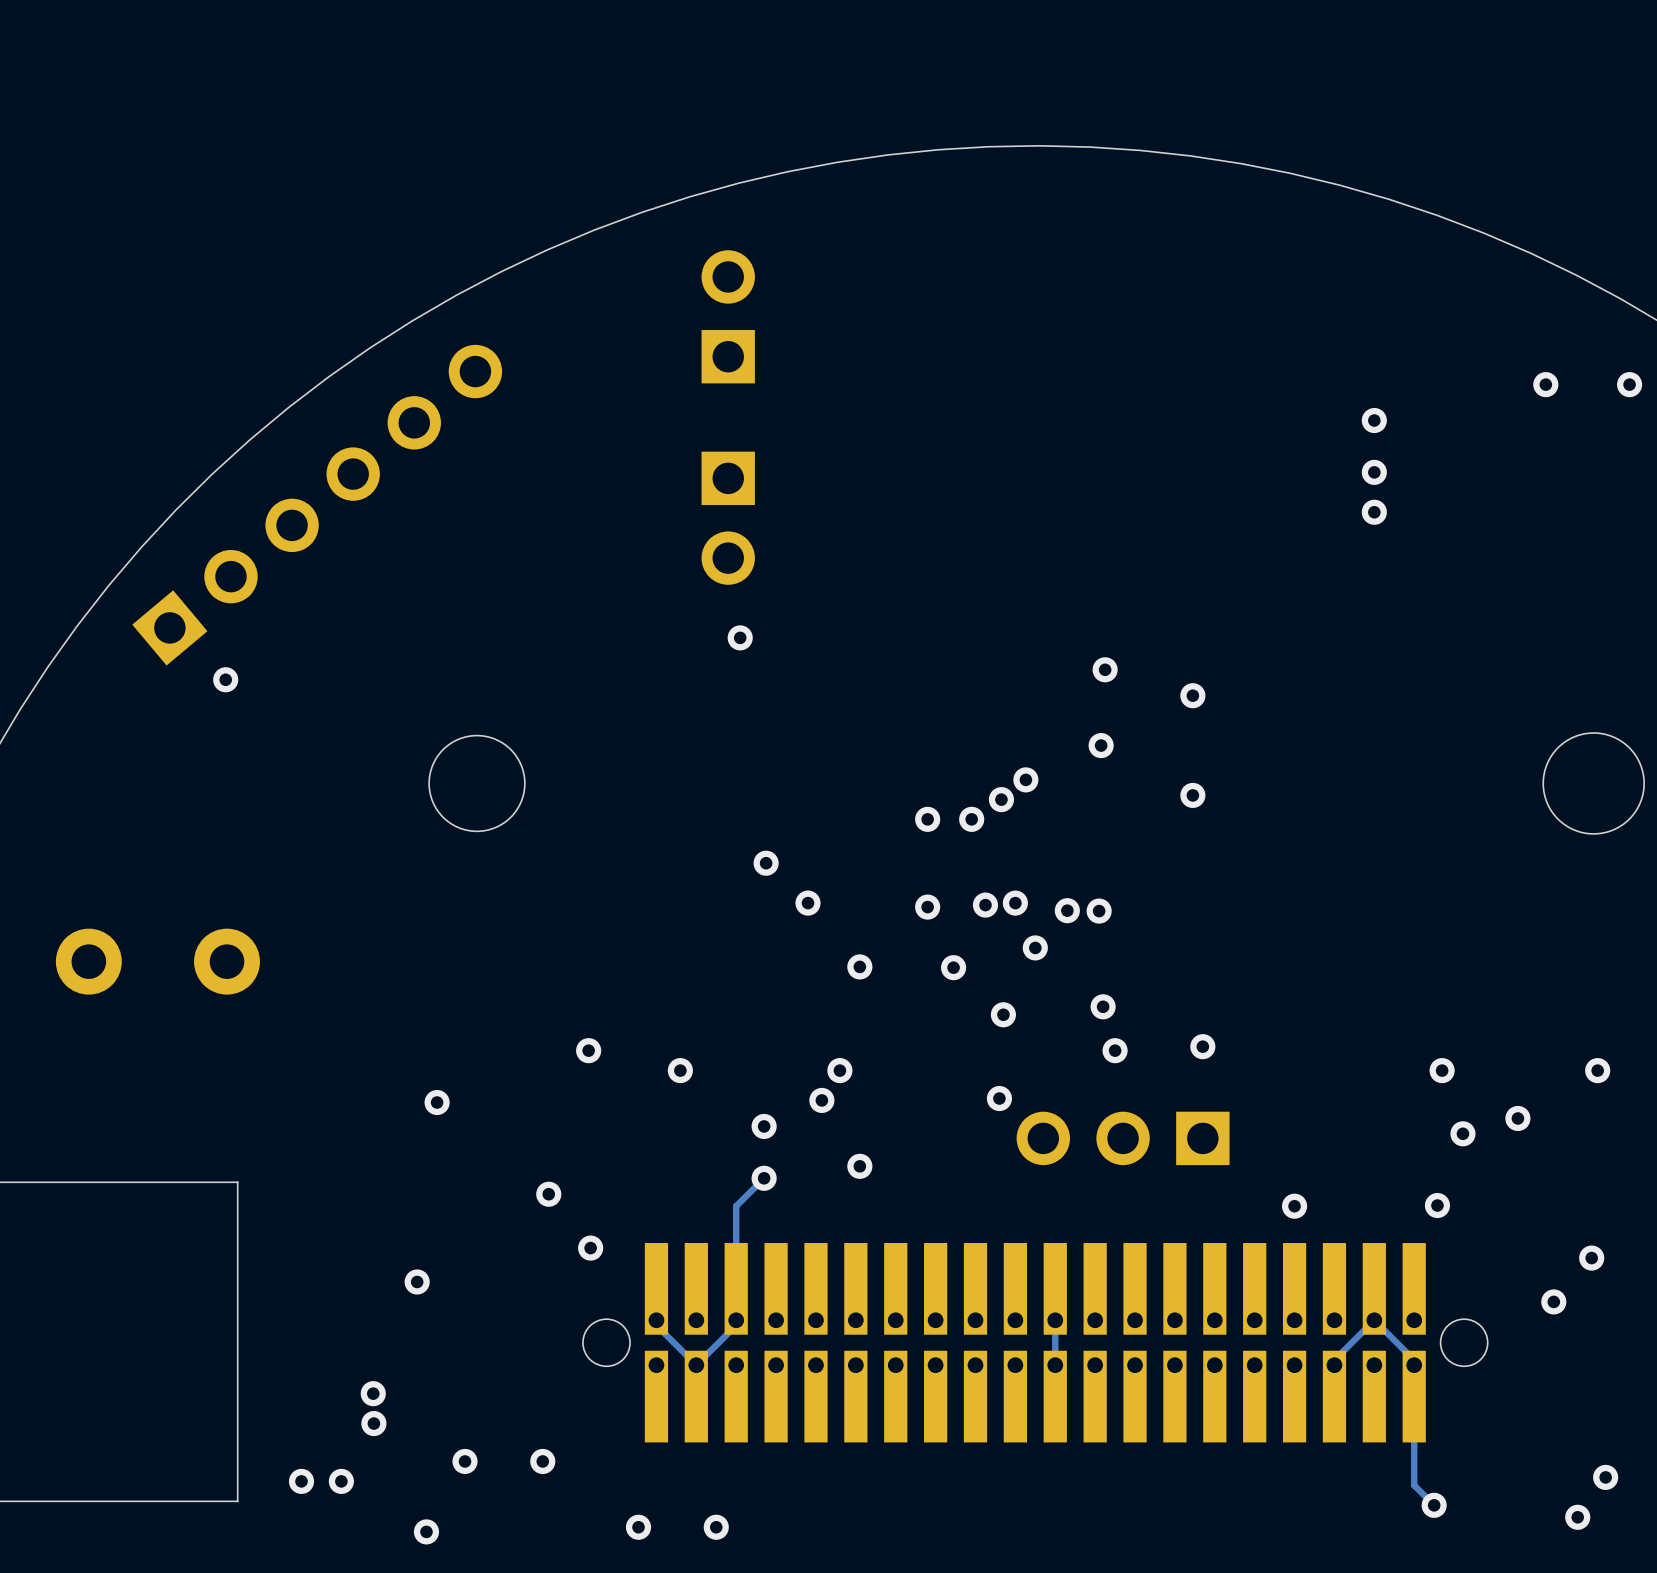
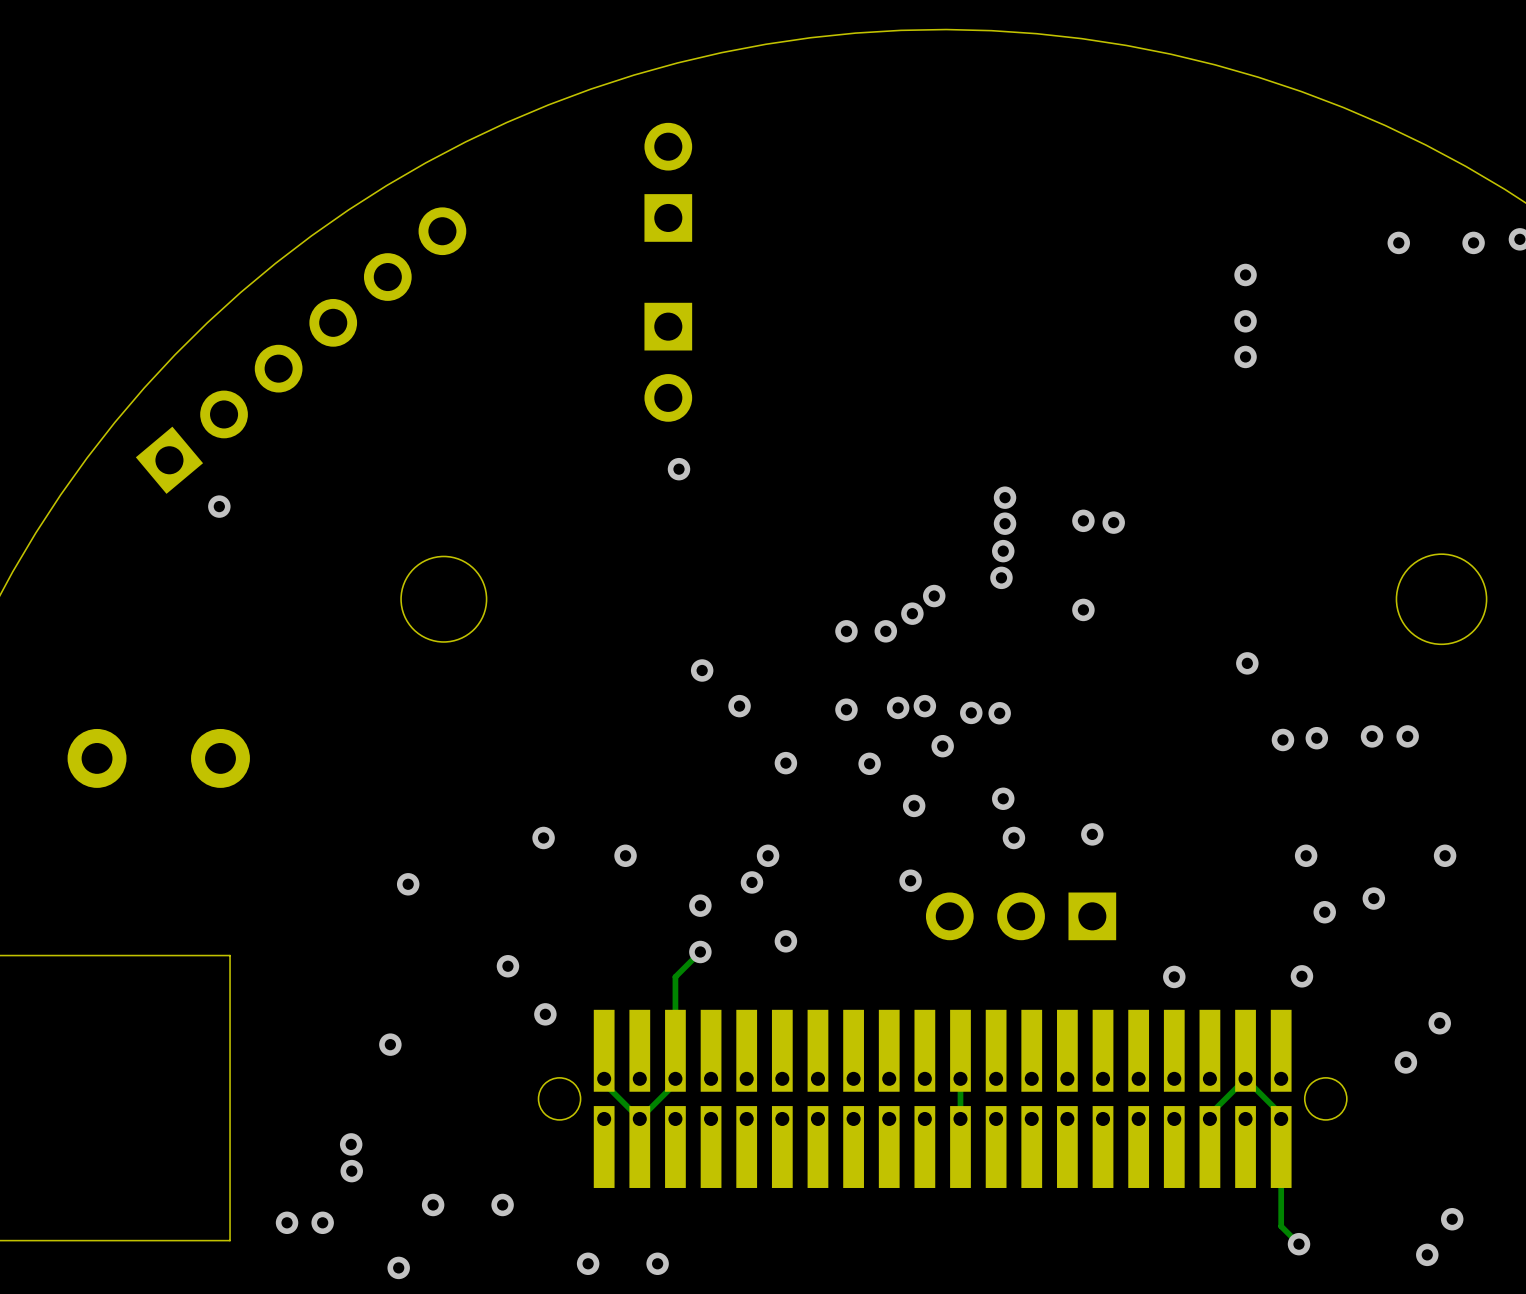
via: none -> (1113, 522)
via: none -> (1005, 523)
via: none -> (1003, 551)
via: (1101, 745) -> none
via: none -> (1001, 577)
via: none -> (1247, 663)
via: none -> (1372, 736)
via: none -> (1407, 736)
via: none -> (1316, 738)
via: none -> (1282, 739)

